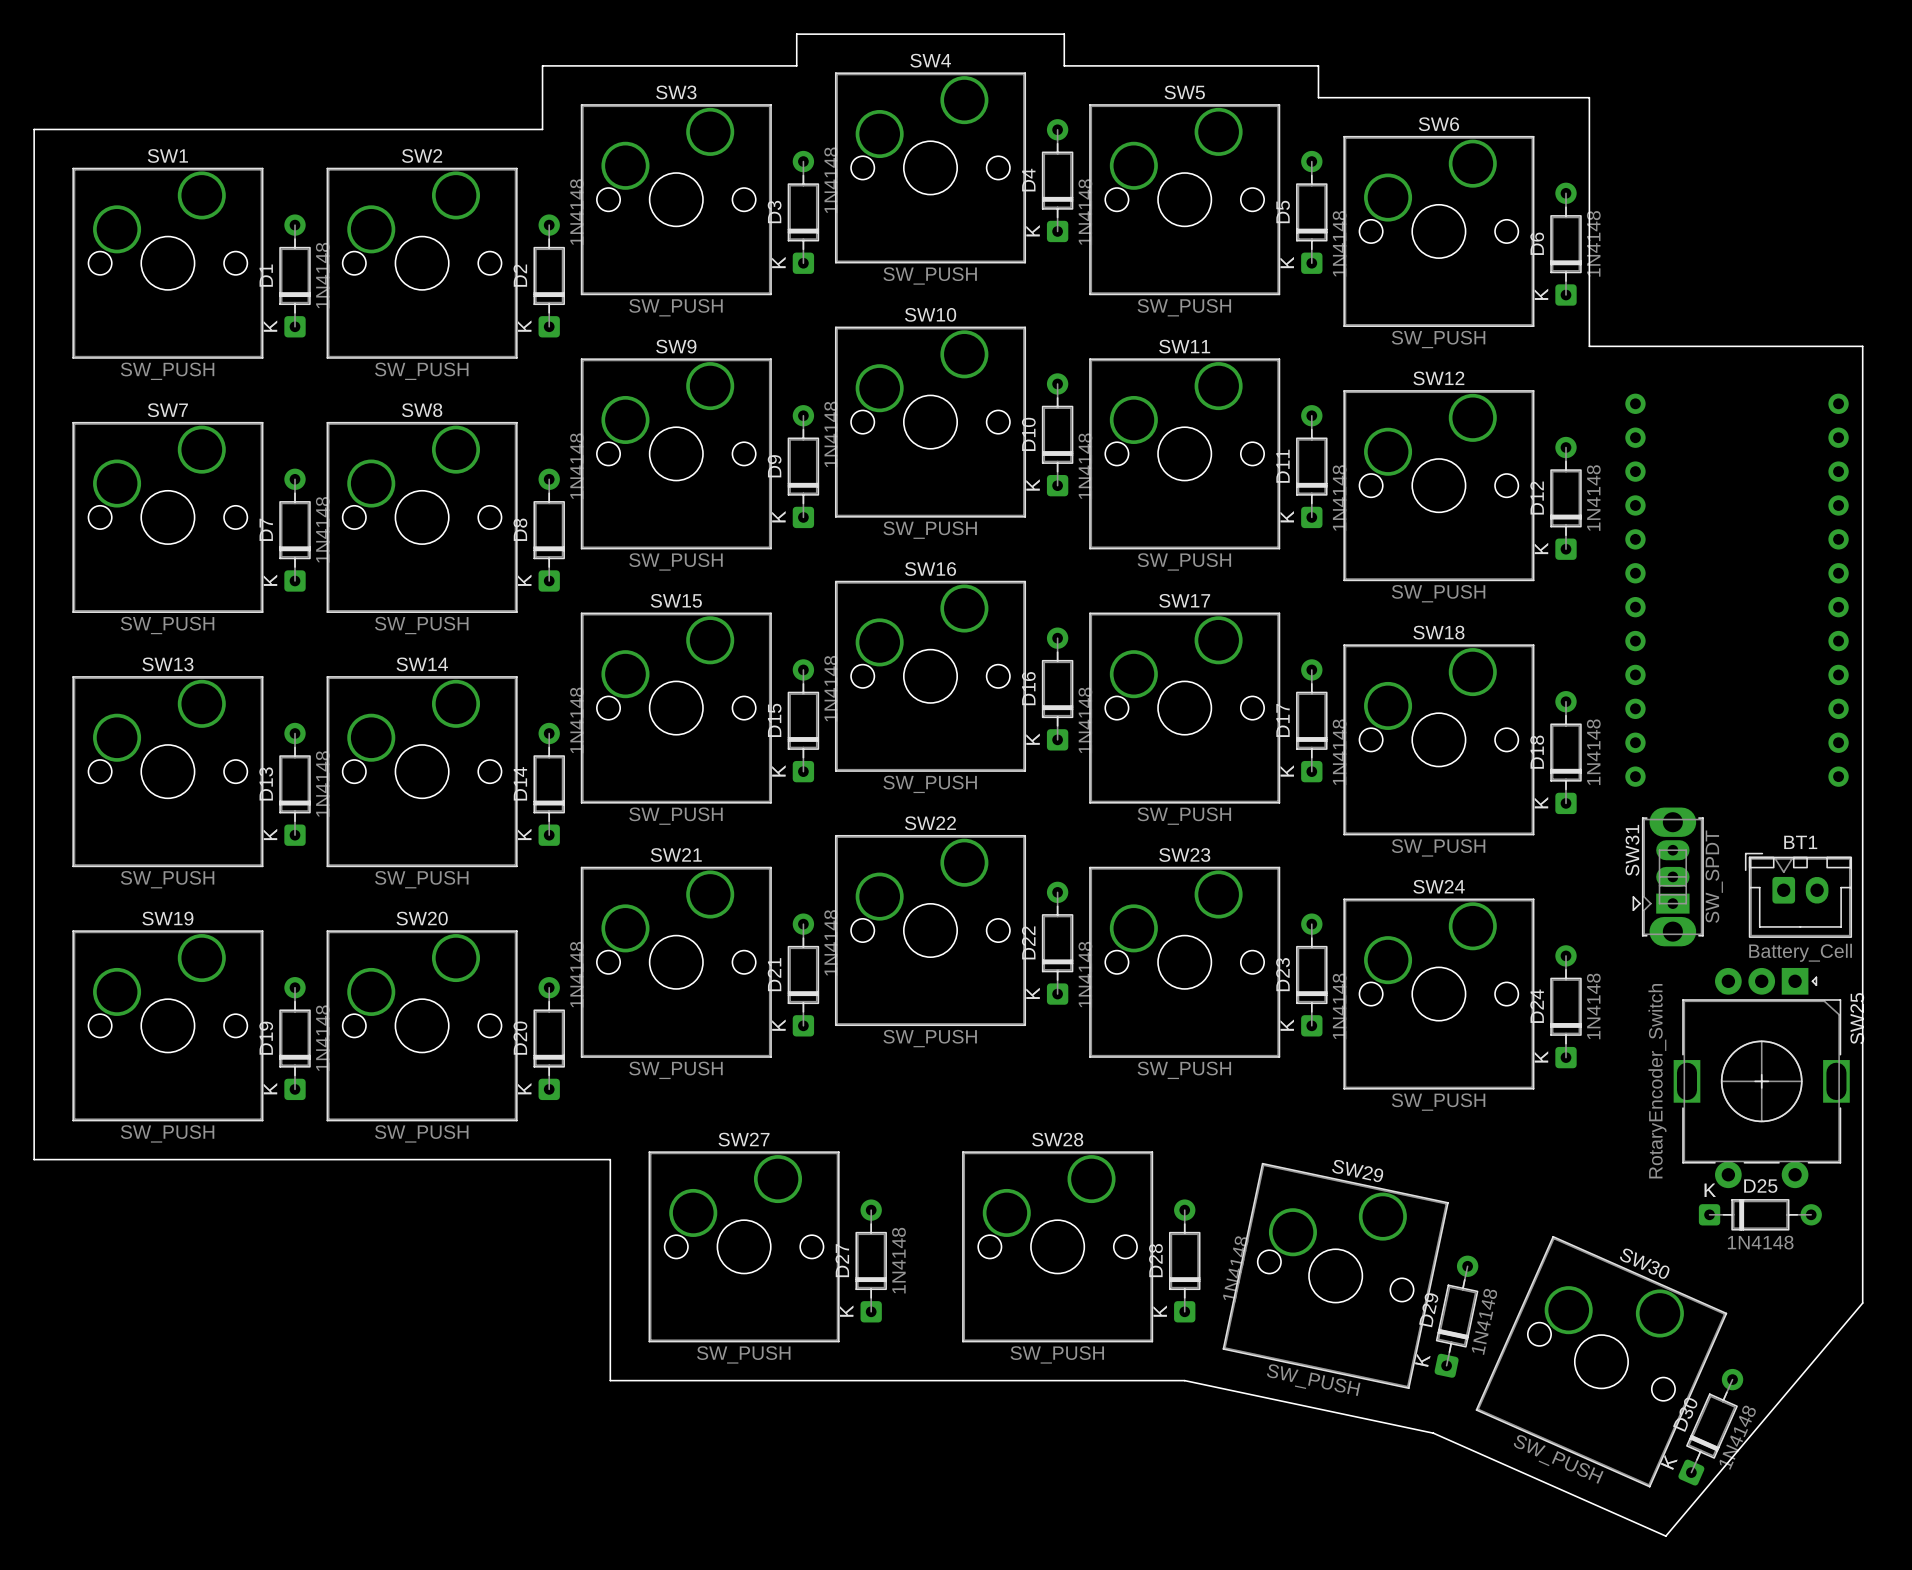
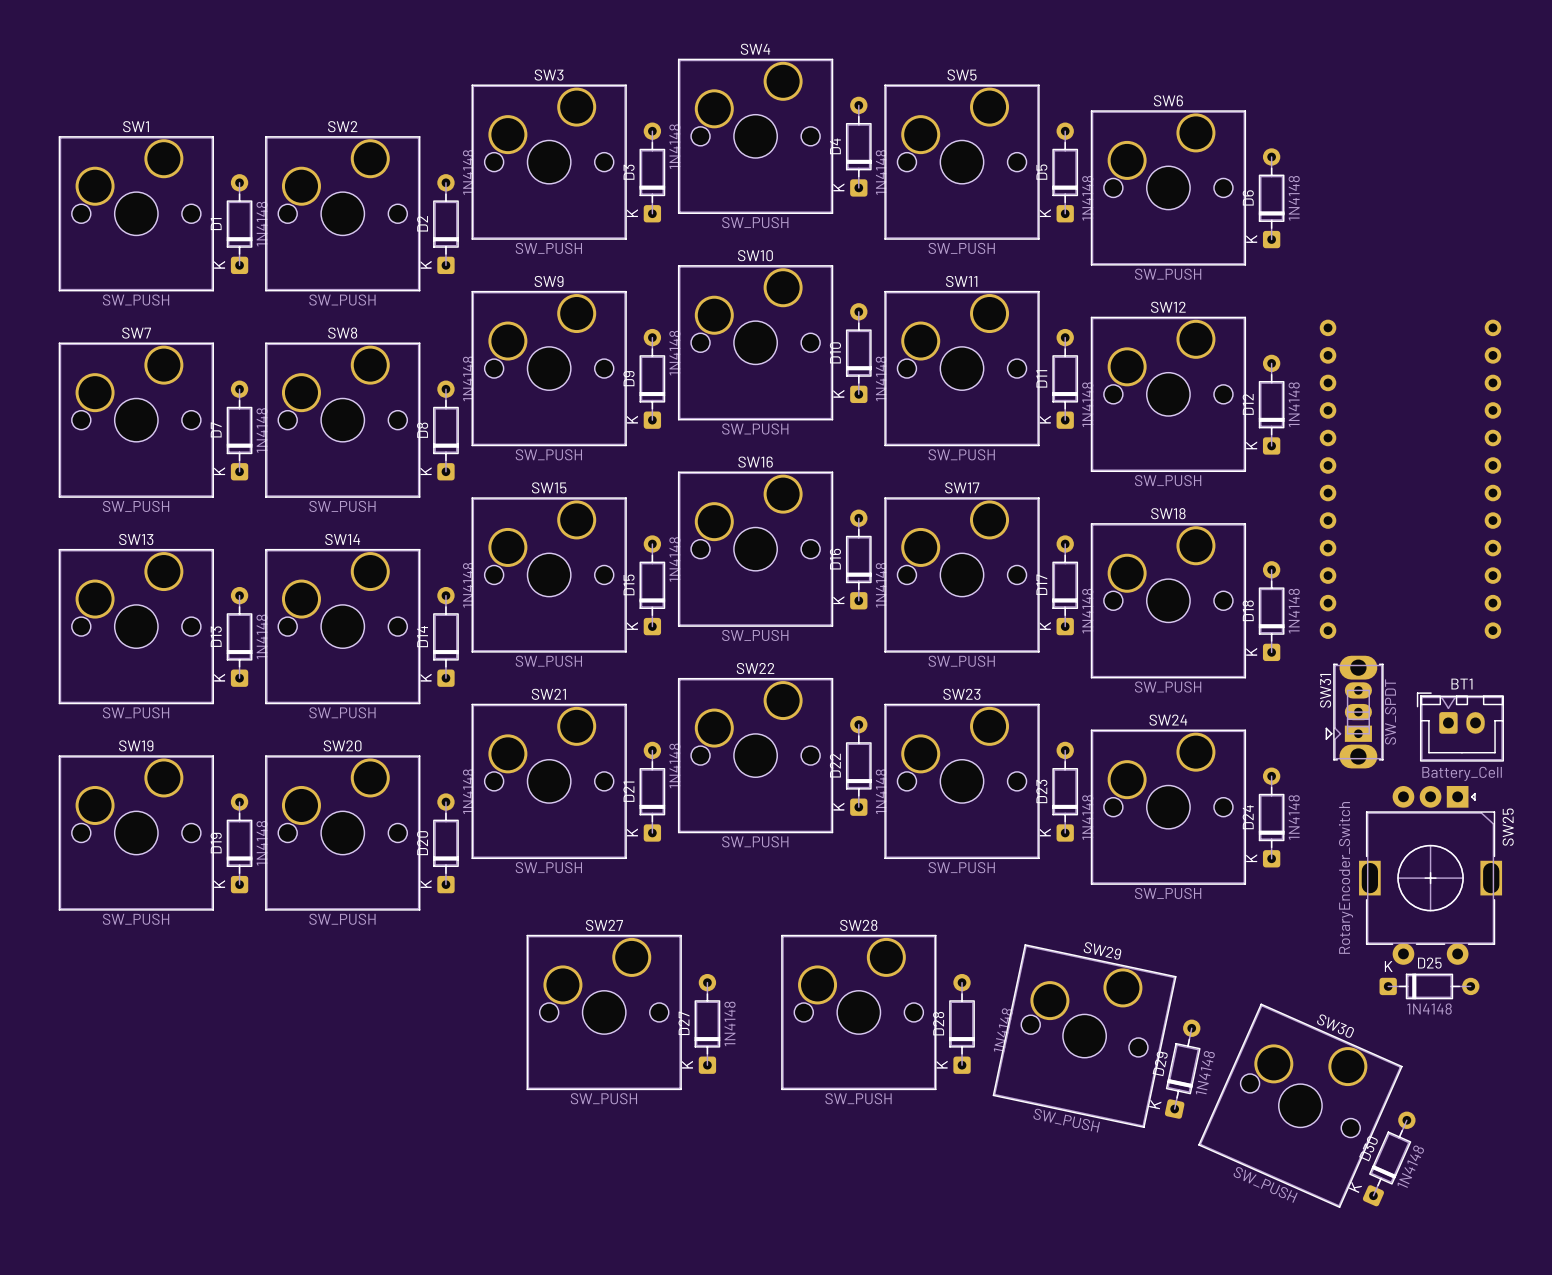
board edge: (796, 34) (796, 65) (542, 65) (542, 129) (34, 129) (34, 1159) (610, 1159) (610, 1380) (1184, 1380) (1433, 1433) (1665, 1536) (1862, 1303) (1862, 346) (1589, 346) (1589, 97) (1318, 97) (1318, 65) (1064, 65) (1064, 34) (796, 34) -> none

